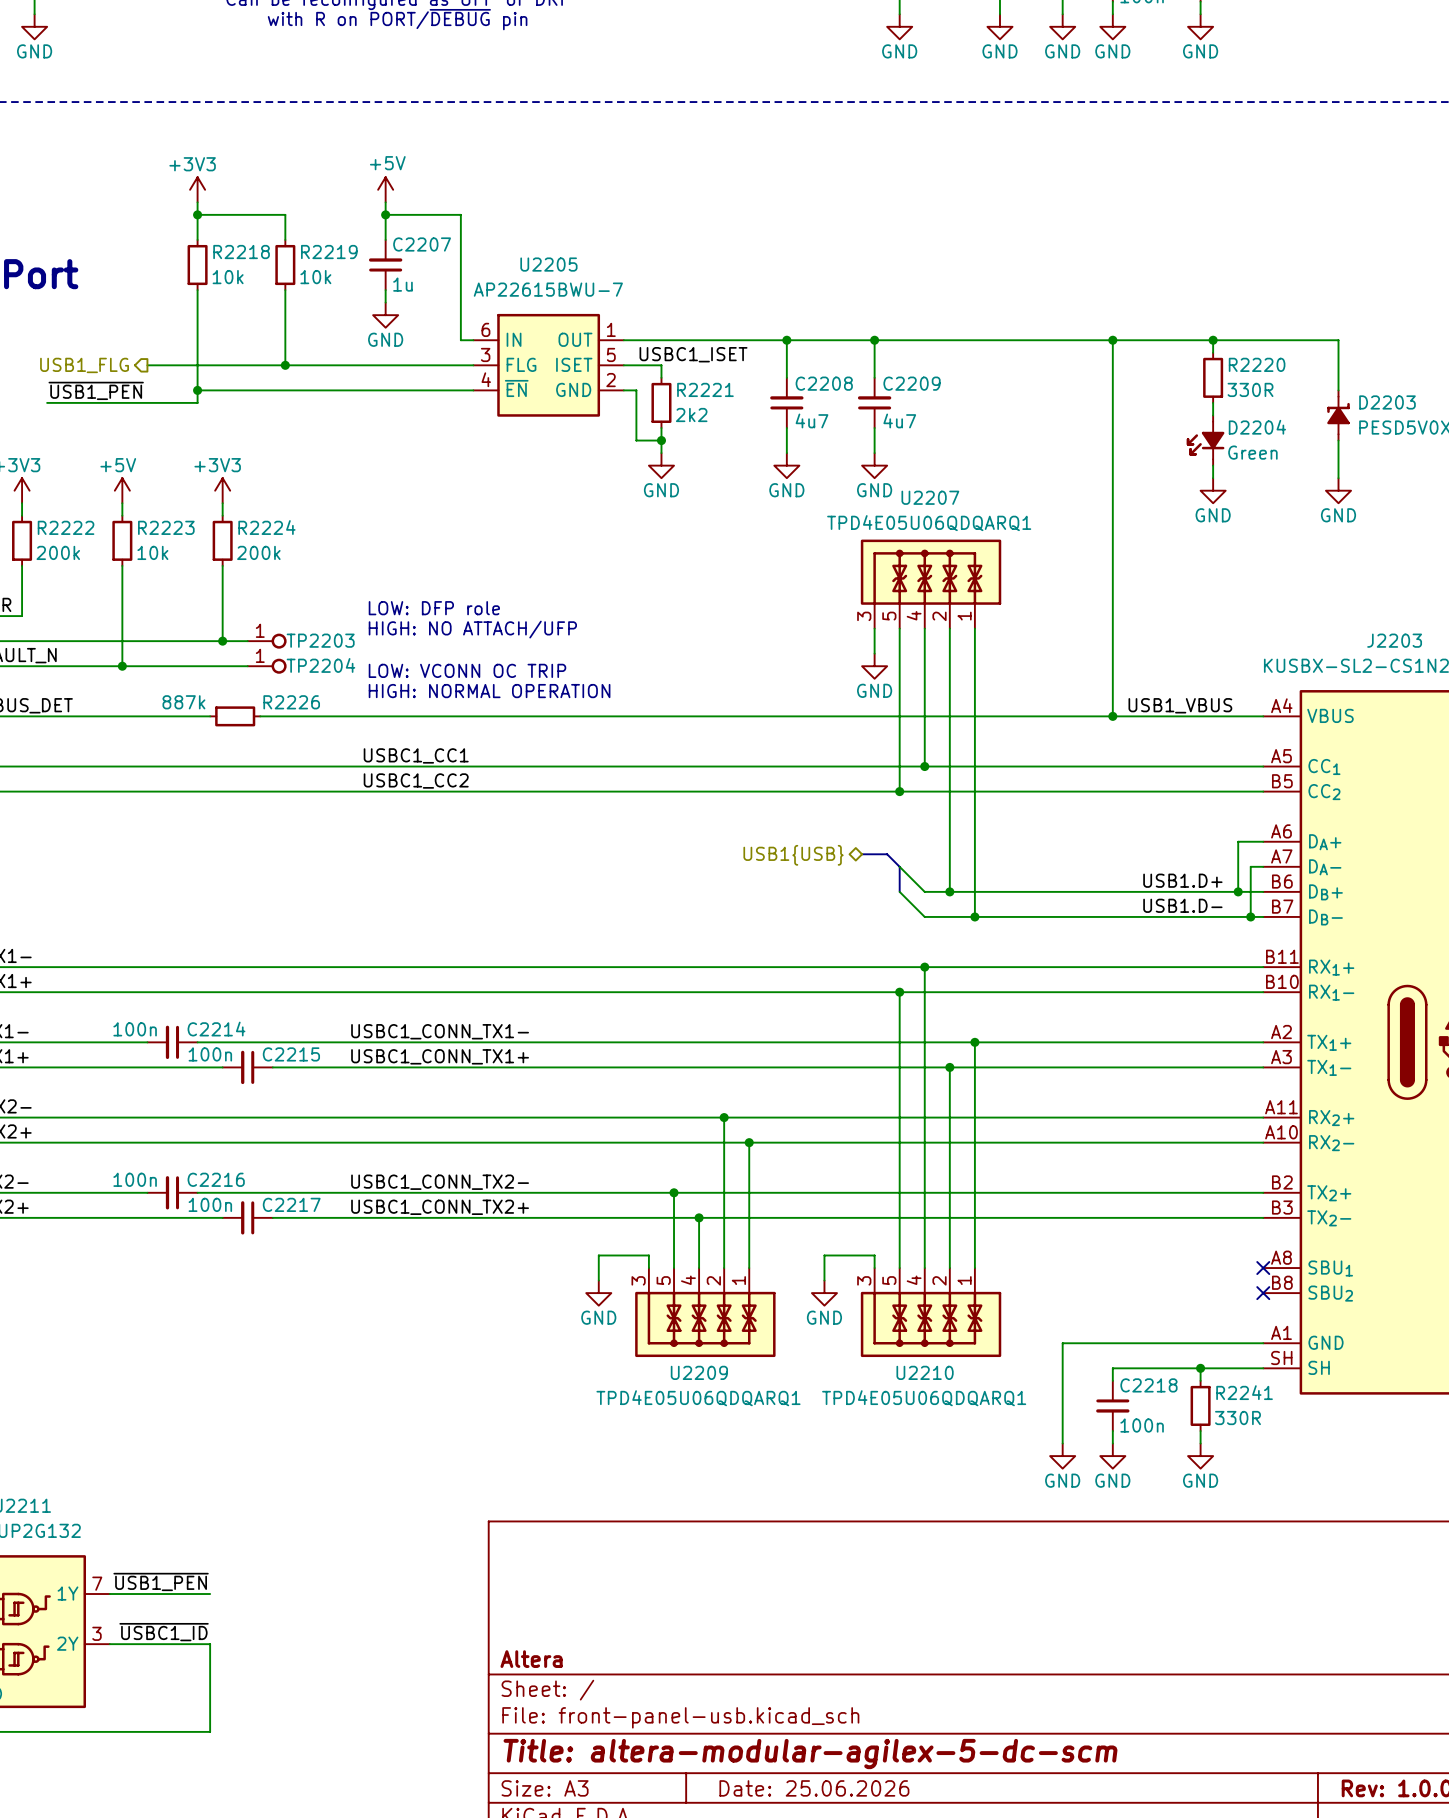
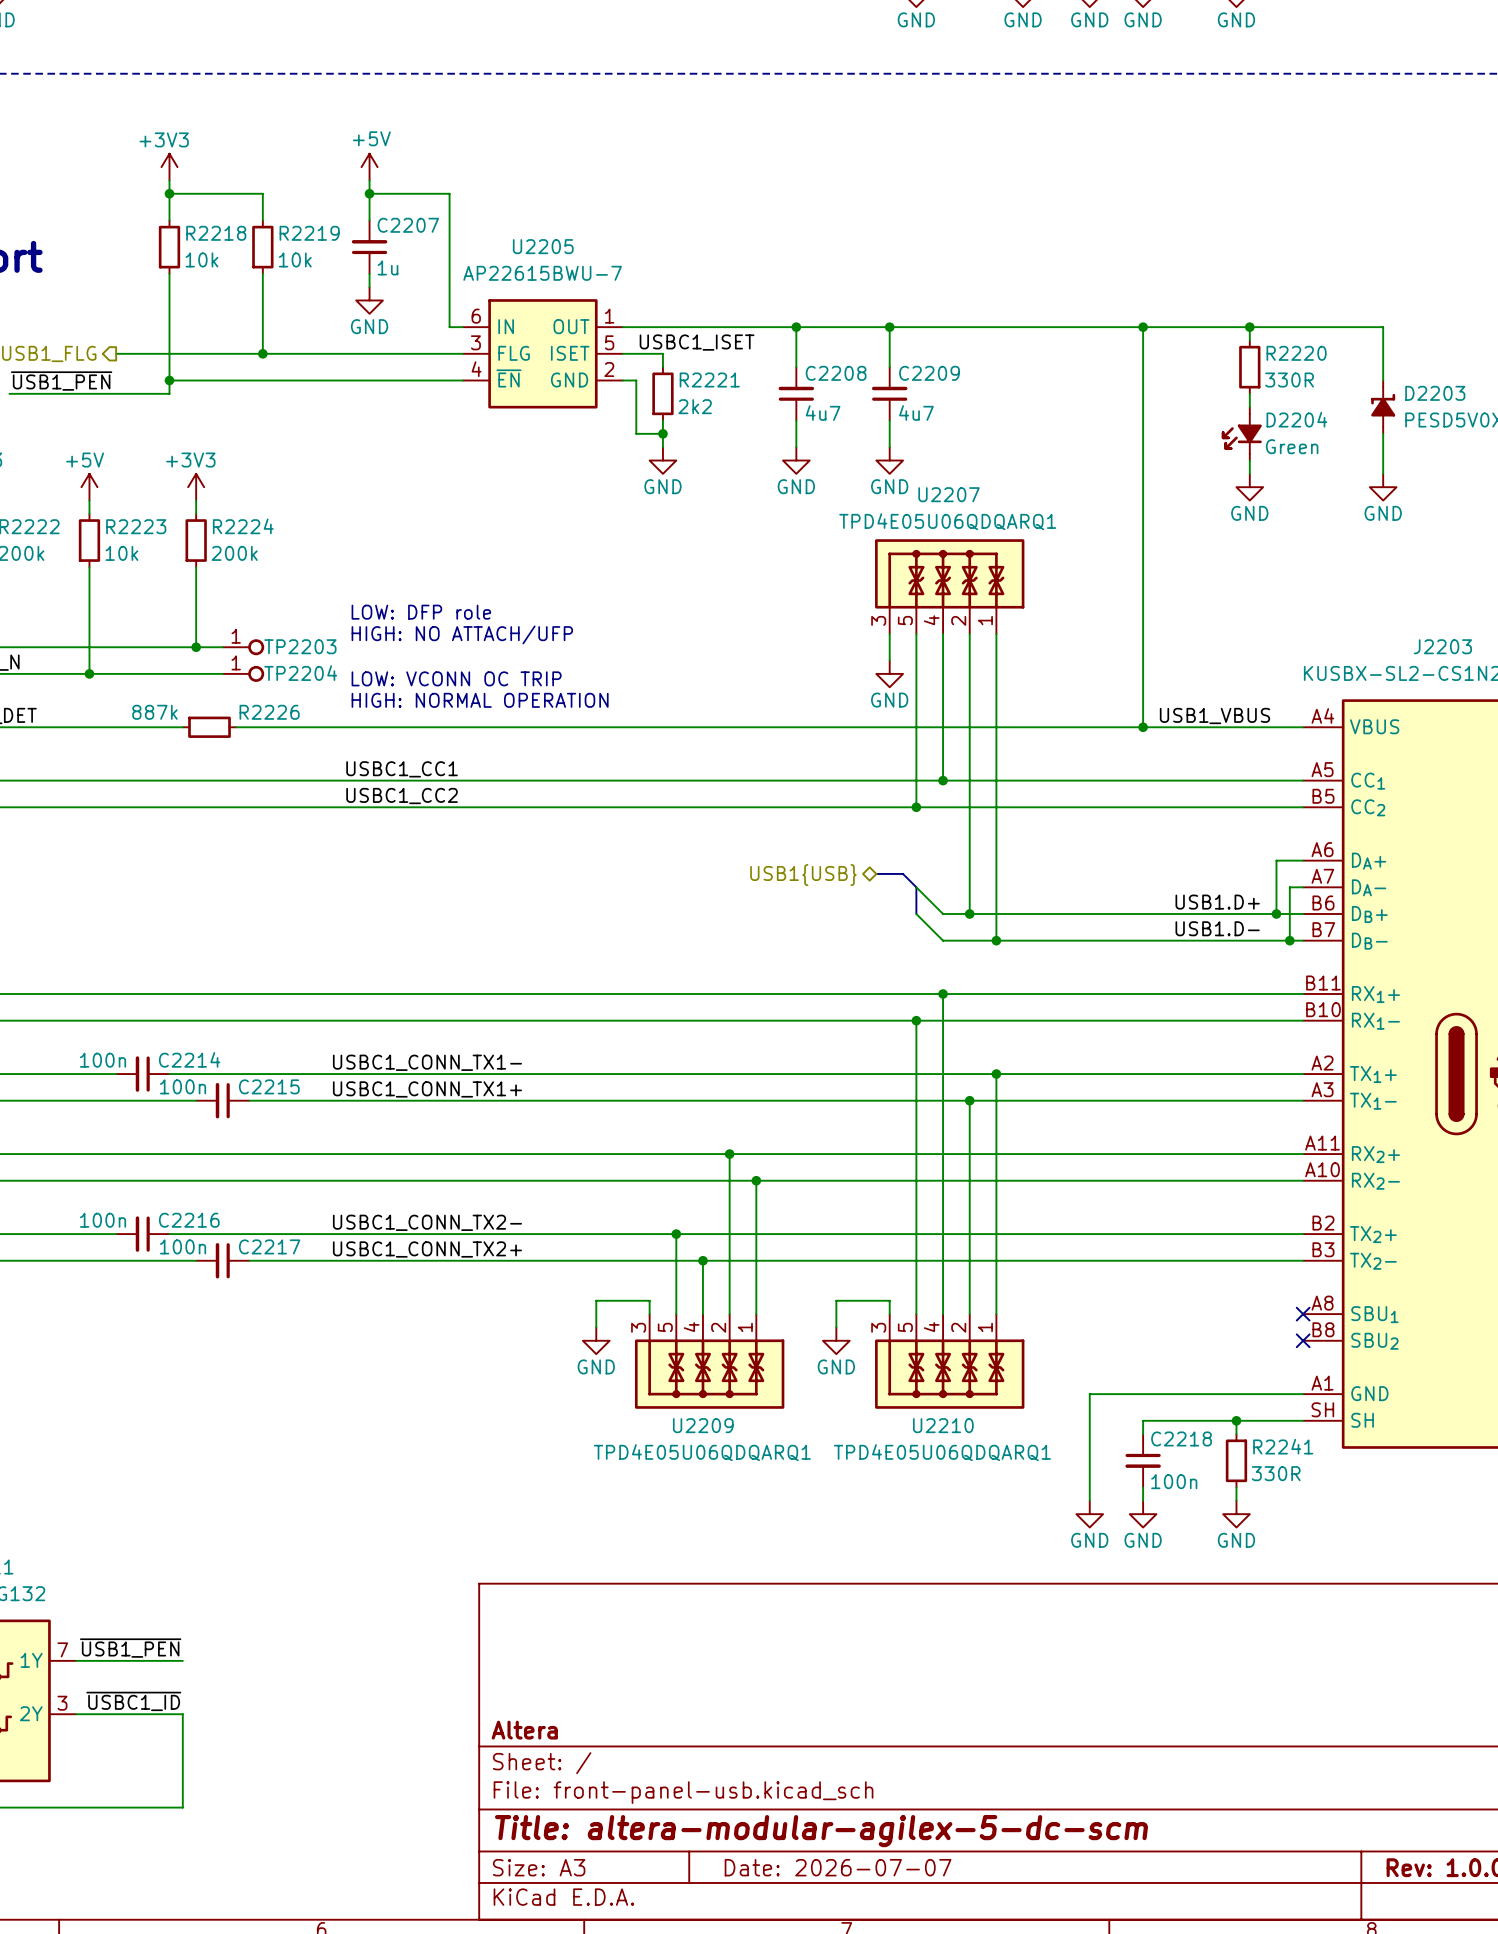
title block: Date: 25.06.2026 (814, 1788) -> Date: 2026-07-07 (838, 1867)

